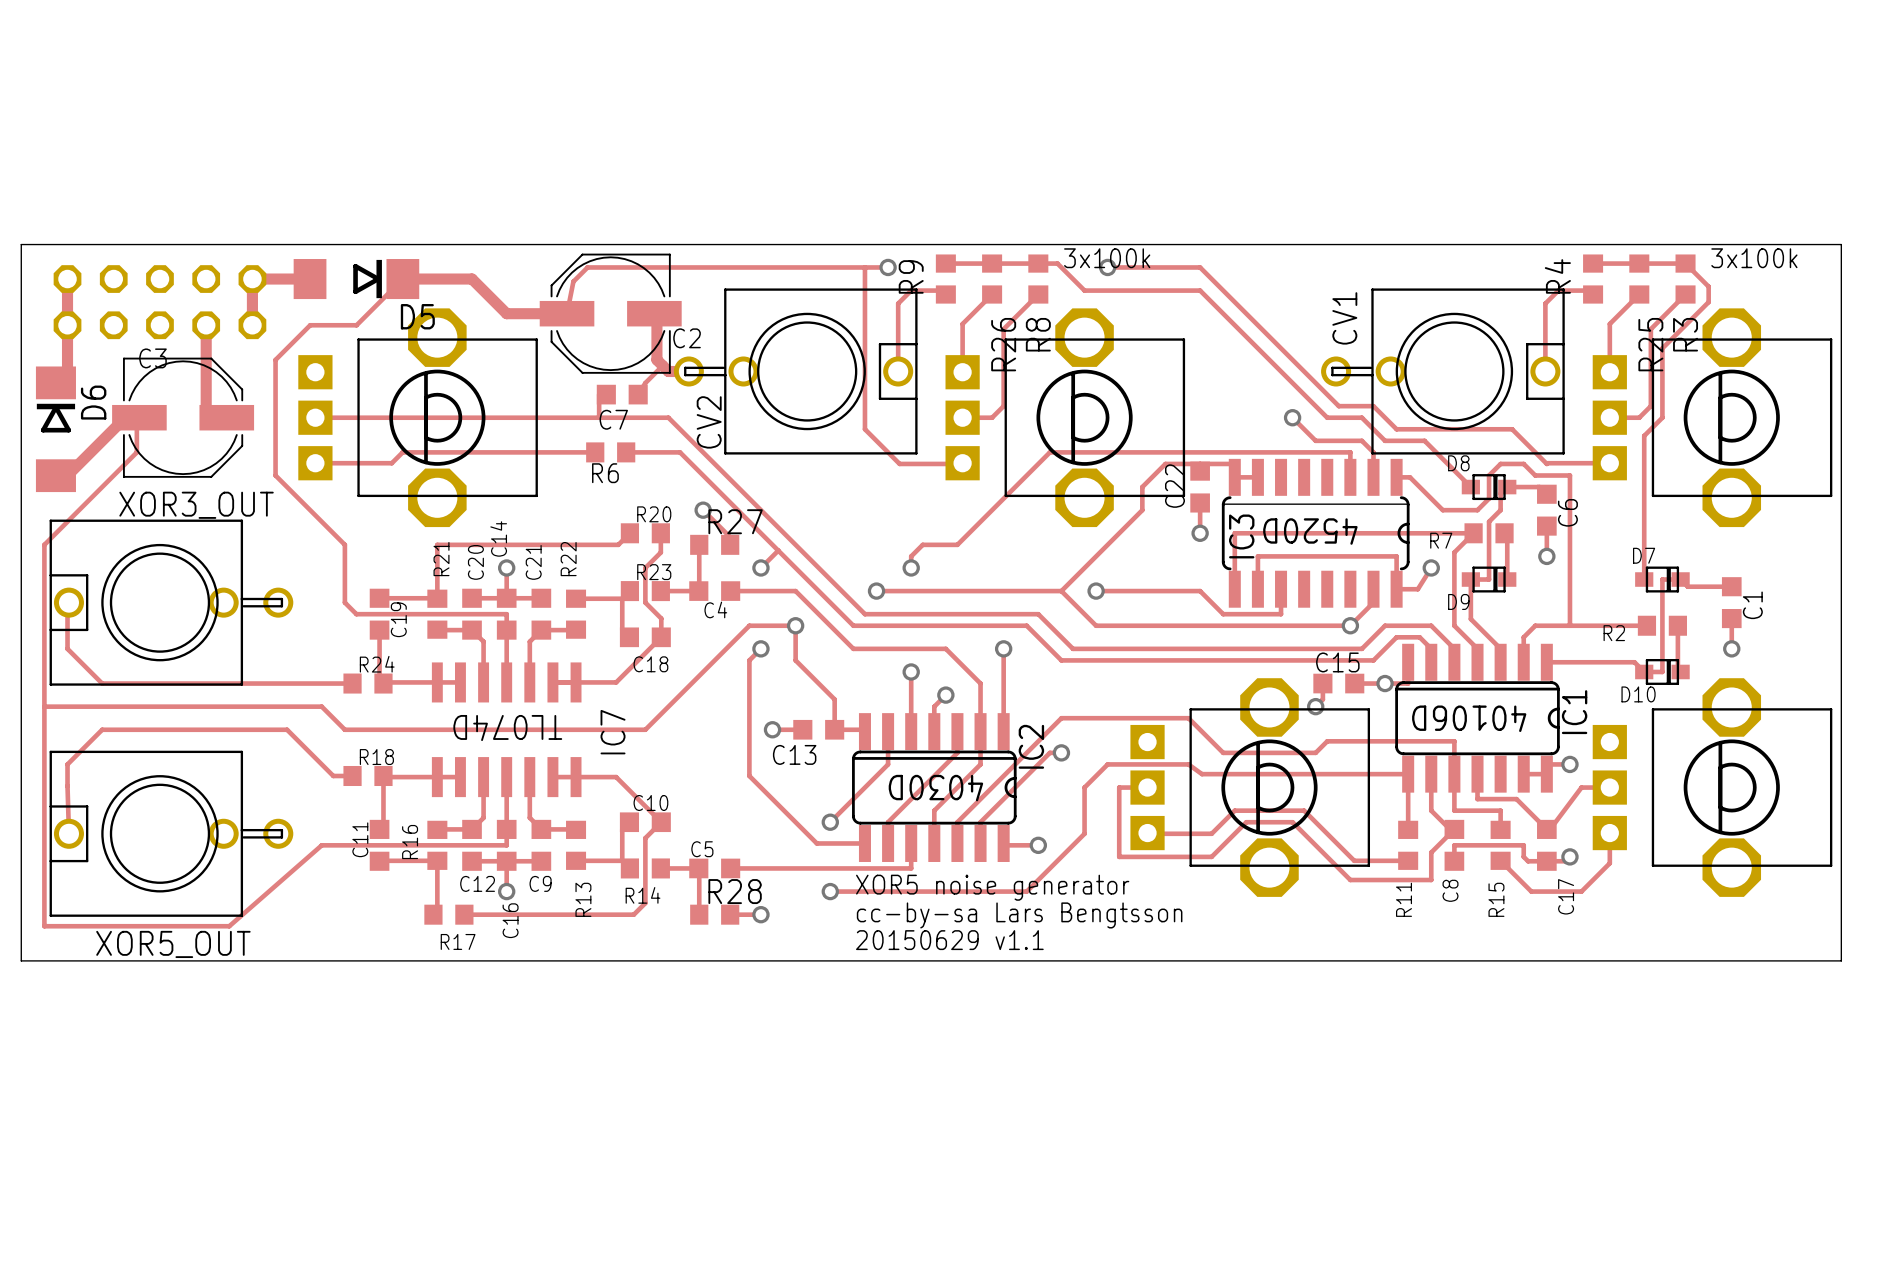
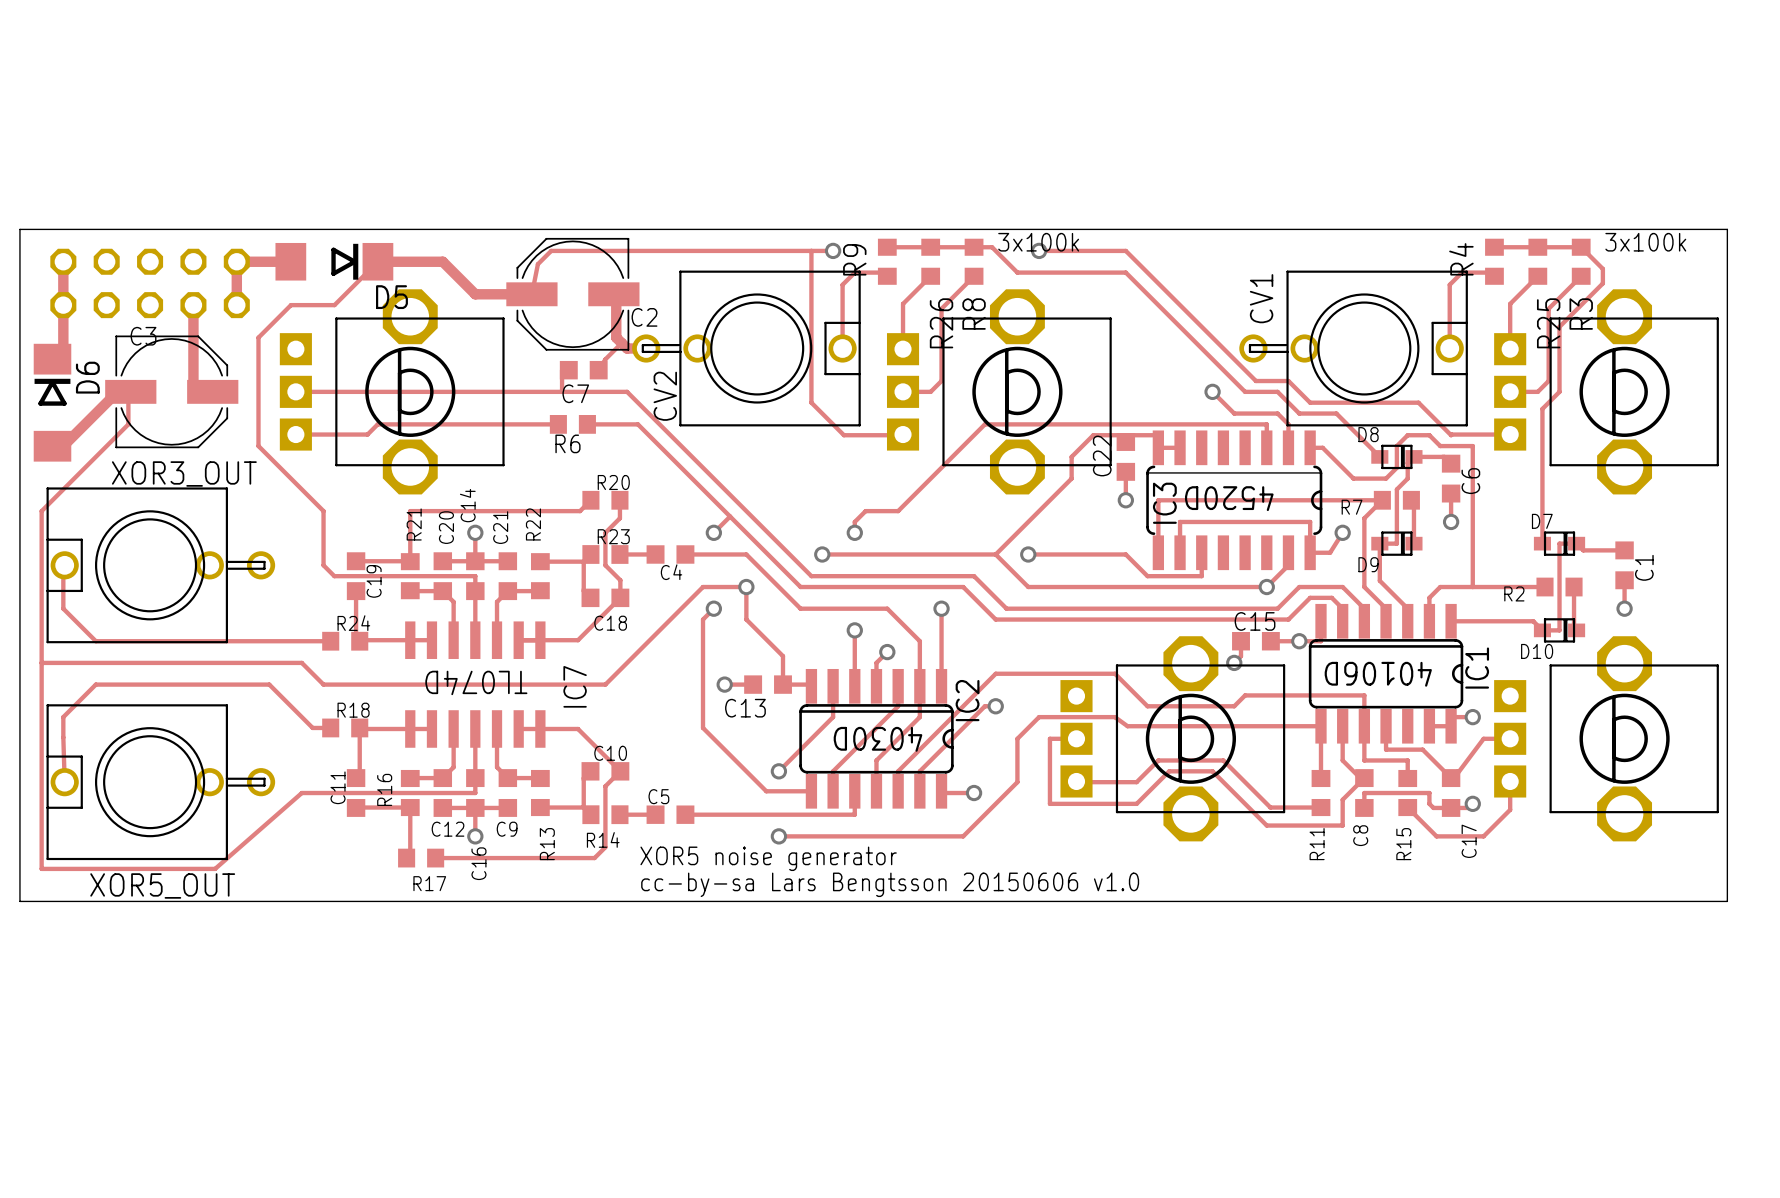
track: (703, 510) (730, 537) (730, 544) -> none
via: (703, 510) -> none
track: (699, 544) (698, 591) -> none
R27: (714, 544) -> none
track: (698, 868) (699, 914) -> none
text position: XOR5 noise generator (992, 887) -> XOR5 noise generator (768, 858)
R28: (714, 914) -> none
track: (730, 914) (760, 914) -> none
via: (760, 914) -> none
text: cc-by-sa Lars Bengtsson (1019, 915) -> cc-by-sa Lars Bengtsson 20150606 v1.0 (890, 884)
text: 20150629 v1.1 (949, 940) -> none

